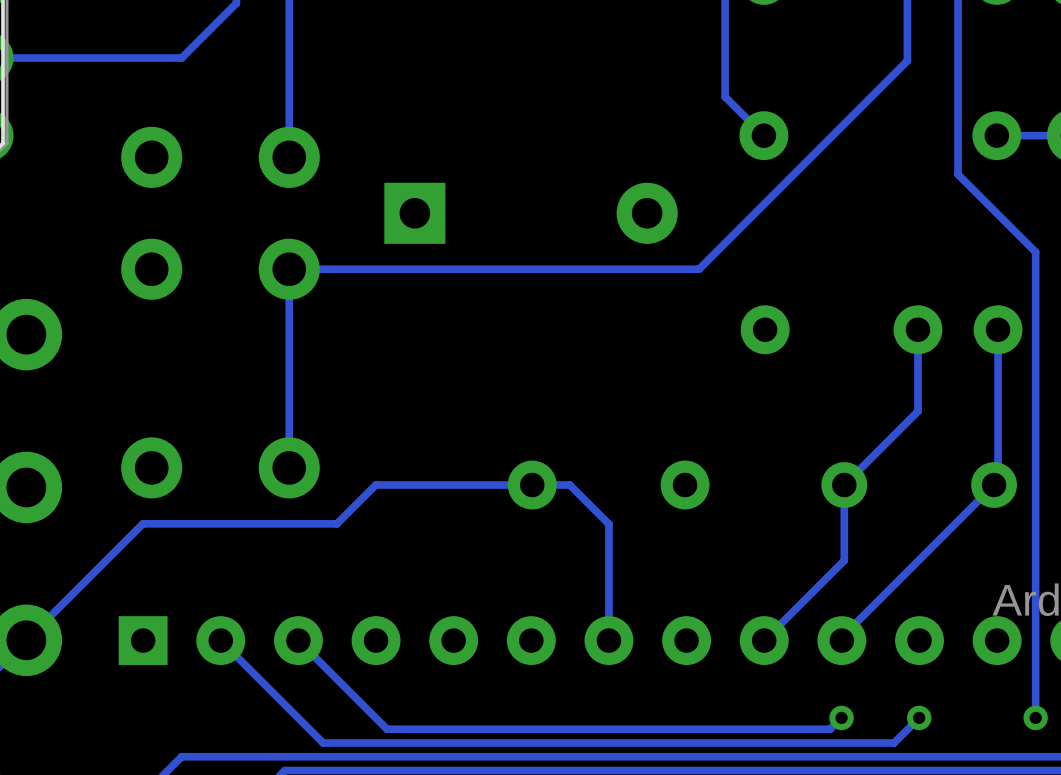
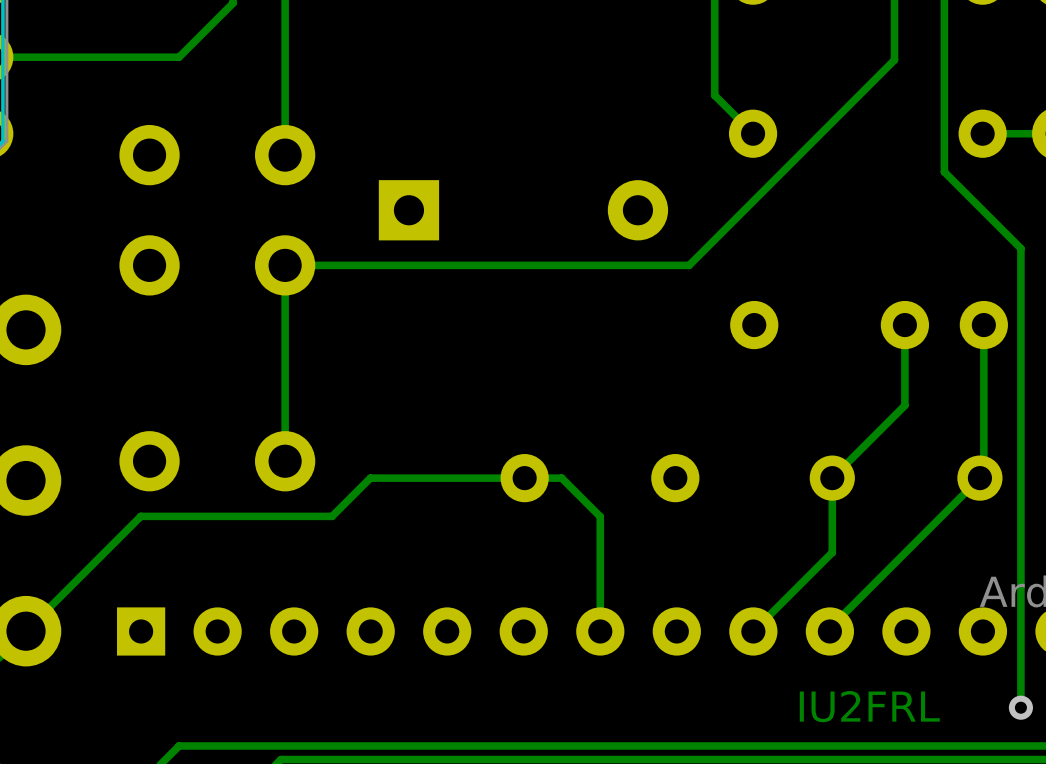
track: (220, 640) (323, 742) (894, 742) (919, 717) -> none
track: (298, 640) (387, 729) (830, 729) (841, 717) -> none
text: none -> IU2FRL (869, 706)
via: (841, 717) -> none
via: (919, 717) -> none

